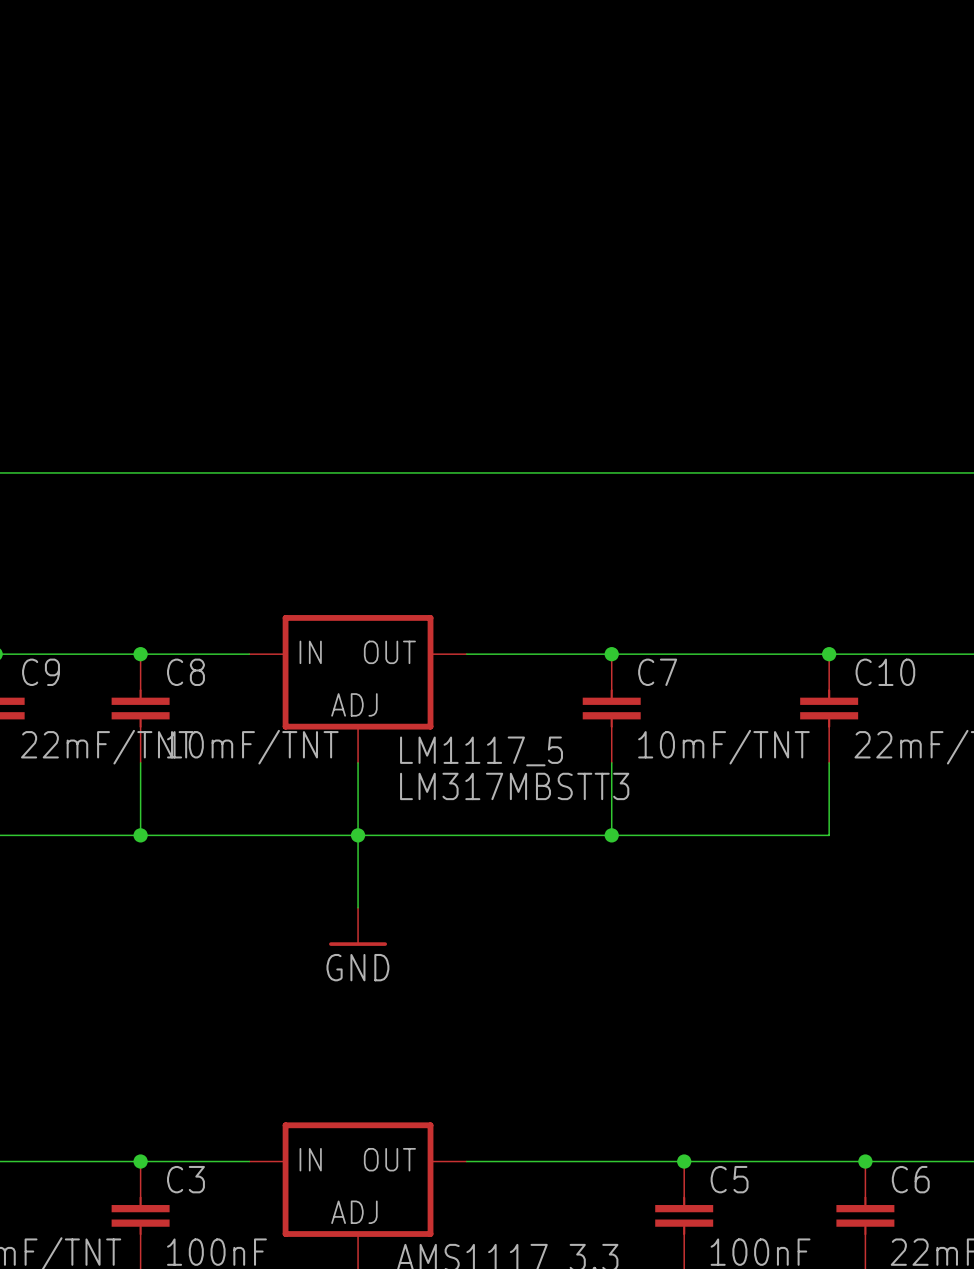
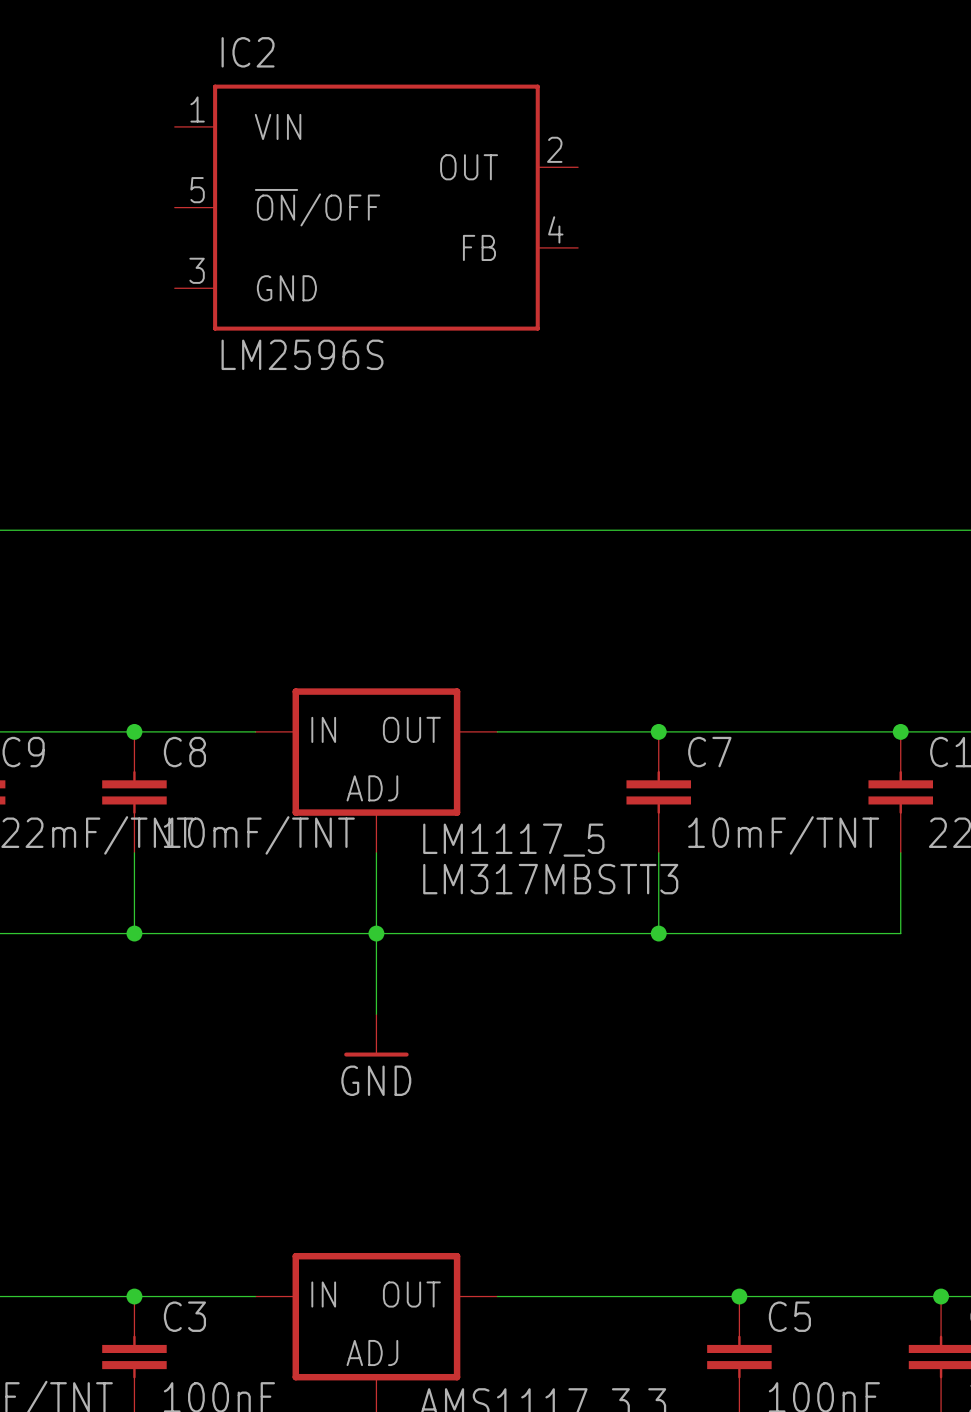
IC2: none -> LM2596S (376, 207)

